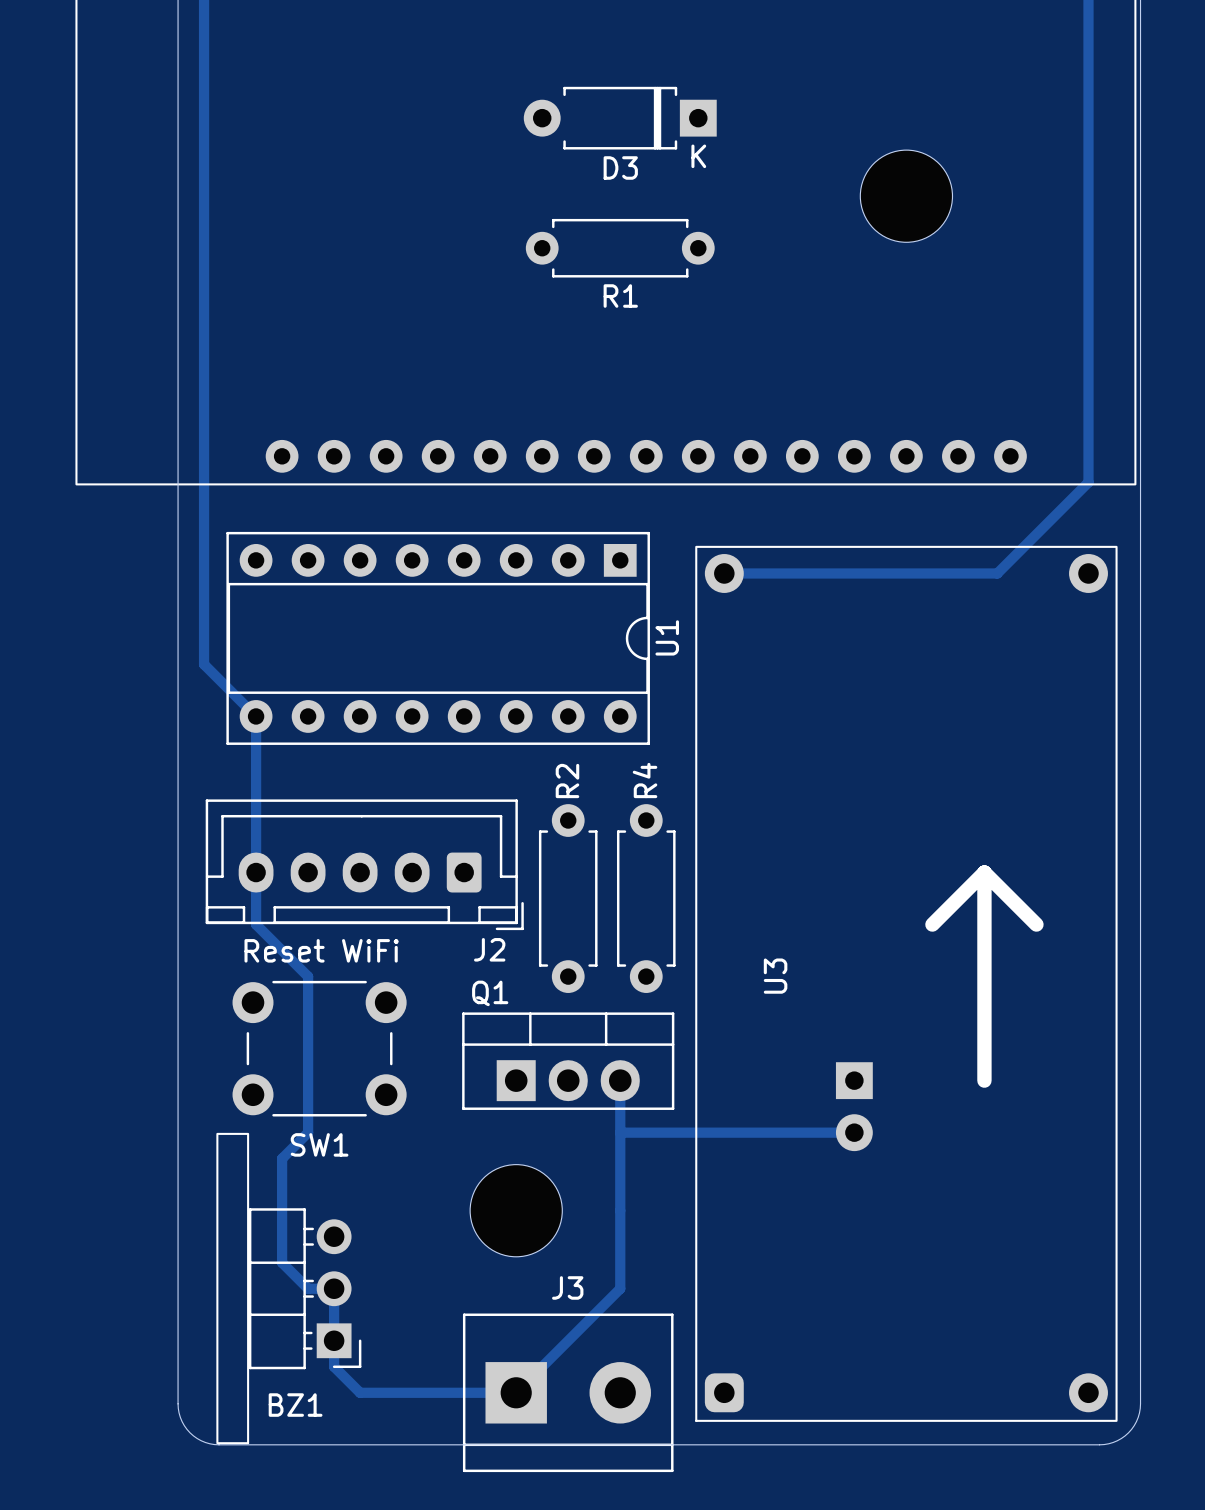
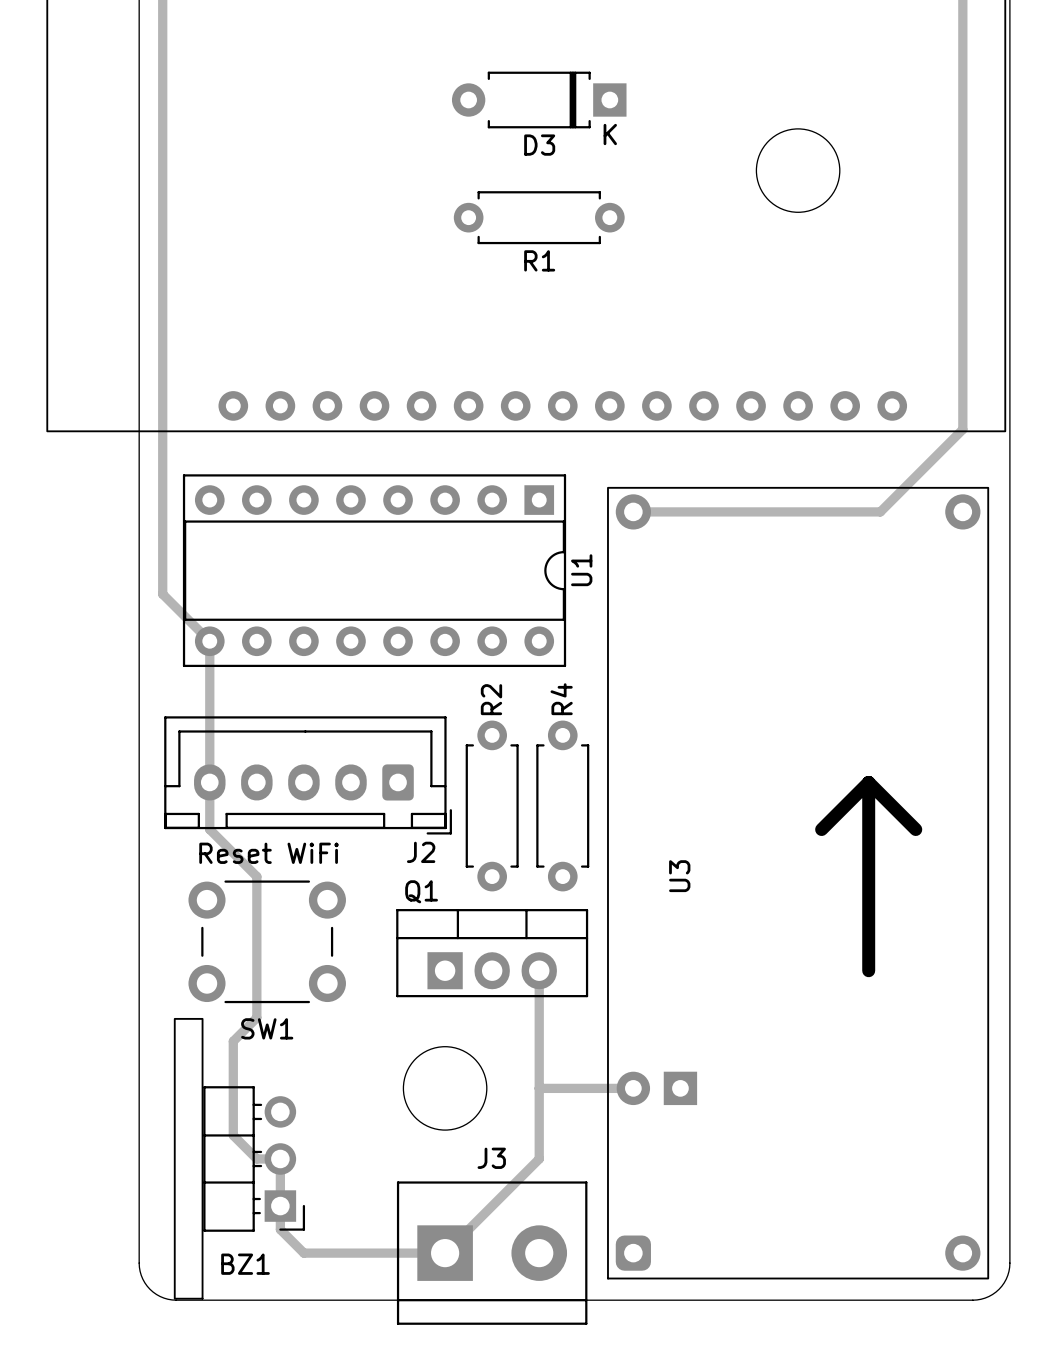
part rotation: 0° (854, 1106) -> 90° clockwise (656, 1088)
part position: (854, 1106) -> (656, 1088)
track: (620, 1132) (854, 1132) -> none
track: none -> (539, 1088) (633, 1088)

